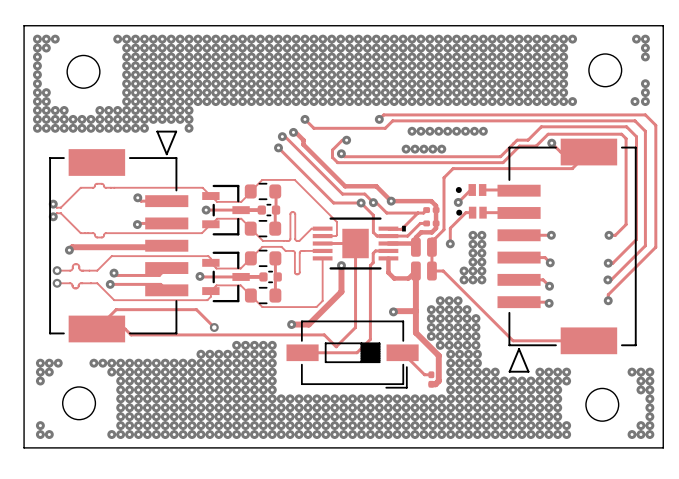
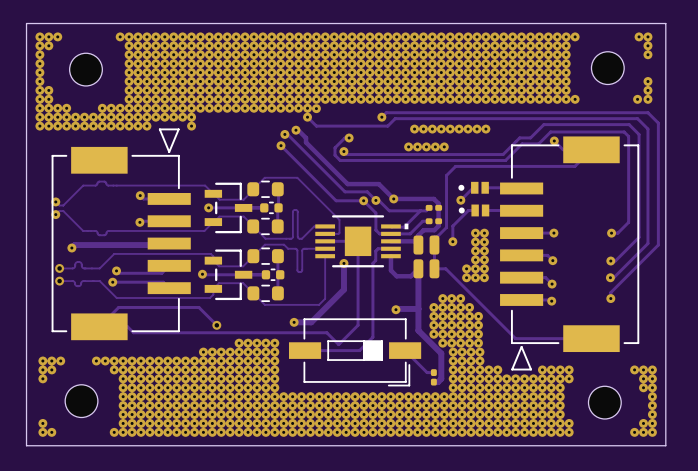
via: none -> (200, 108)
via: none -> (209, 108)
via: none -> (218, 108)
via: none -> (227, 108)
via: none -> (236, 108)
via: none -> (245, 108)
via: none -> (253, 108)
via: none -> (262, 108)
via: none -> (271, 108)
via: none -> (280, 108)
via: none -> (289, 108)
via: none -> (298, 108)
via: none -> (307, 108)
via: none -> (316, 108)

